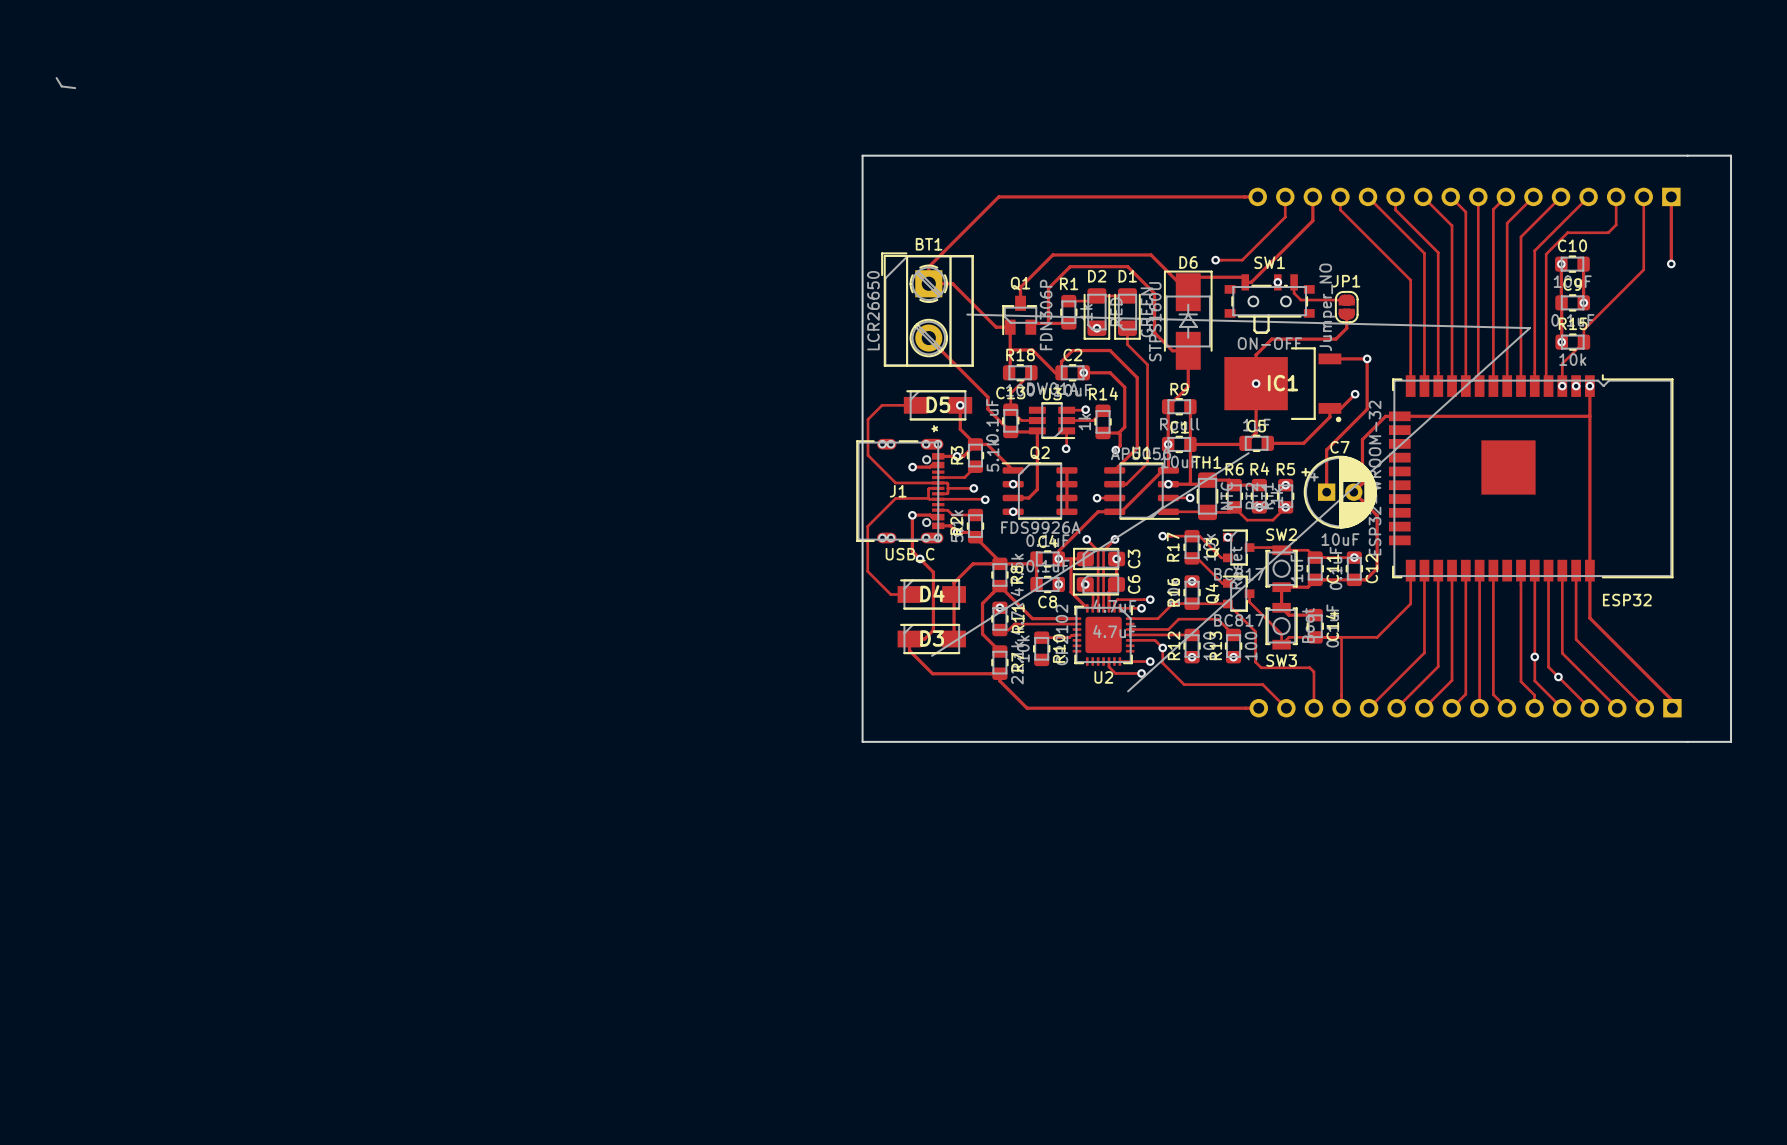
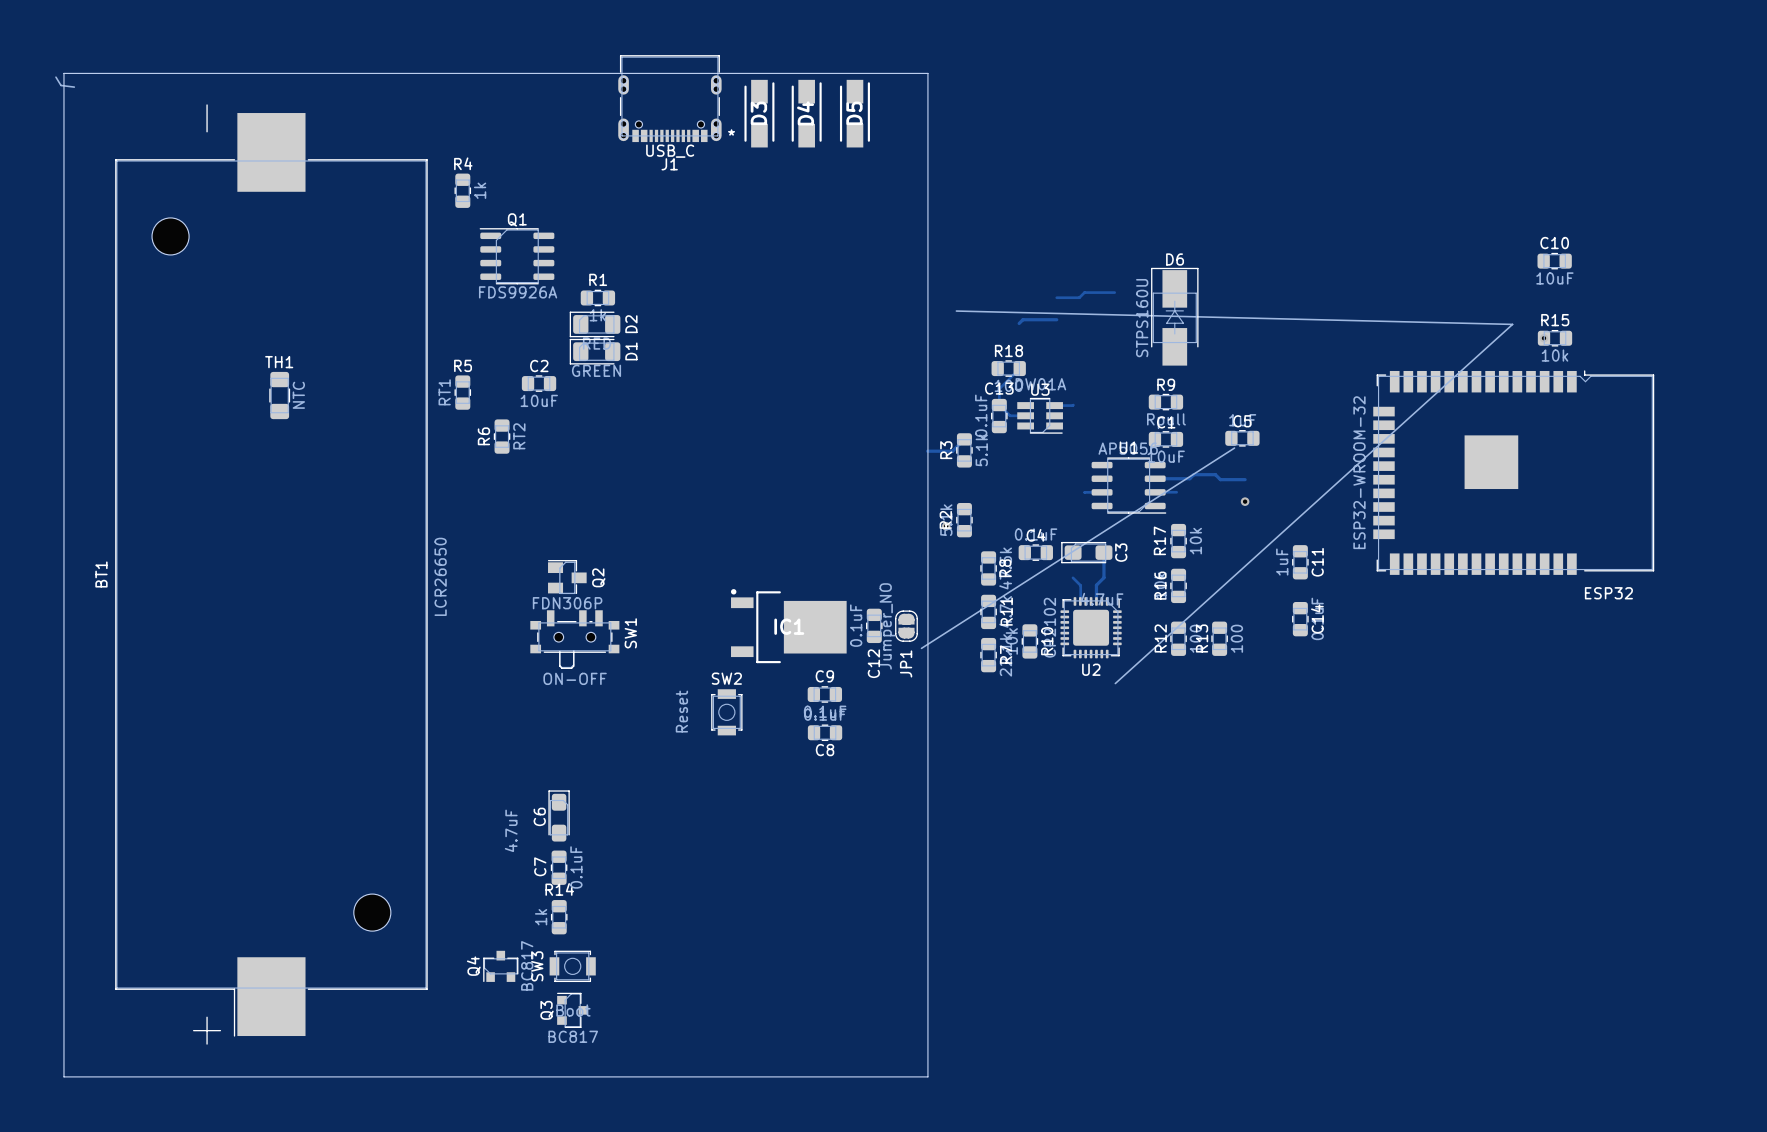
board edge: none -> (63, 73) (927, 73) (927, 1076) (63, 1076) (63, 73)
board edge: (862, 155) (1731, 155) (1731, 741) (862, 741) (862, 155) -> none
track: (1257, 196) (998, 196) (928, 266) (928, 283) (952, 283) (996, 327) (1010, 327) (1009, 372) -> none
track: (1285, 196) (1285, 217) (1242, 260) (1215, 260) -> none
track: (1312, 196) (1312, 220) (1251, 282) (1245, 282) (1244, 277) (1192, 277) (1188, 281) (1188, 292) (1151, 255) (1052, 255) (1020, 287) (1020, 303) -> none
track: (1340, 196) (1340, 209) (1410, 280) (1410, 386) -> none
track: (1368, 196) (1424, 253) (1424, 386) -> none
track: (1395, 196) (1395, 209) (1438, 252) (1438, 386) -> none
track: (1423, 196) (1452, 225) (1452, 386) -> none
track: (1450, 196) (1465, 212) (1465, 386) -> none
part: (1464, 196) -> none
track: (1478, 196) (1479, 386) -> none
track: (1505, 196) (1493, 209) (1493, 386) -> none
track: (1533, 196) (1507, 223) (1507, 386) -> none
track: (1561, 196) (1520, 236) (1520, 386) -> none
track: (1588, 196) (1534, 250) (1534, 386) -> none
track: (1616, 196) (1616, 224) (1608, 232) (1567, 232) (1546, 254) (1546, 383) (1548, 386) -> none
track: (1643, 196) (1643, 269) (1583, 329) (1583, 342) (1562, 363) (1562, 386) -> none
track: (1671, 196) (1671, 263) -> none
BT1 name position: BT1 (929, 244) -> BT1 (101, 574)
BT1 footprint: [881, 252, 974, 367] -> [115, 104, 428, 1045]
via: (1215, 260) -> none
SW1 name rotation: 0° (1269, 262) -> 90° counterclockwise (630, 633)
SW1 name position: SW1 (1269, 262) -> SW1 (630, 633)
via: (1671, 263) -> none
track: (1561, 264) (1561, 342) -> none
via: (1561, 264) -> none
track: (1583, 264) (1583, 302) -> none
JP1 name rotation: 0° (1346, 281) -> 90° counterclockwise (906, 663)
JP1 name position: JP1 (1346, 281) -> JP1 (906, 663)
via: (1277, 282) -> none
track: (1294, 282) (1294, 293) (1300, 300) (1346, 300) -> none
Q1 footprint: [1002, 295, 1037, 335] -> [479, 228, 555, 285]
C9 position: (1572, 302) -> (824, 694)
via: (1583, 302) -> none
SW1 position: (1269, 303) -> (574, 639)
JP1 position: (1346, 307) -> (906, 626)
BT1 value position: LCR26650 (873, 310) -> LCR26650 (440, 576)
R1 rotation: 0° (1068, 312) -> 90° clockwise (597, 297)
R1 position: (1068, 312) -> (597, 297)
D2 rotation: 0° (1096, 313) -> 90° clockwise (595, 324)
D2 position: (1096, 313) -> (595, 324)
D1 rotation: 0° (1127, 313) -> 90° clockwise (595, 351)
D1 position: (1127, 313) -> (595, 351)
Q1 value: FDN306P (1046, 314) -> FDS9926A (518, 292)
track: (1346, 314) (1346, 328) (1335, 339) (1271, 339) (1256, 354) (1256, 432) (1244, 444) (1190, 444) -> none
track: (1048, 323) (1048, 288) (1070, 266) (1127, 266) (1154, 293) (1154, 332) (1172, 350) (1188, 350) (1188, 386) (1168, 406) (1168, 470) (1162, 470) (1121, 511) (1098, 511) (1059, 550) (1058, 558) (1085, 558) -> none
via: (1096, 328) -> none
track: (1127, 328) (1127, 344) (1147, 364) (1147, 463) (1126, 484) (1114, 484) -> none
track: (928, 338) (987, 397) (987, 409) (1010, 431) (1037, 430) (1037, 489) (1028, 498) (1013, 498) -> none
track: (1010, 349) (1032, 349) (1055, 372) (1061, 372) (1061, 361) (1072, 350) (1110, 350) (1137, 377) (1137, 447) (1114, 470) -> none
track: (1329, 358) (1367, 358) (1367, 409) (1326, 449) (1326, 492) -> none
via: (1367, 358) -> none
C2 position: (1072, 372) -> (539, 383)
track: (1083, 372) (1110, 372) (1124, 387) (1124, 427) (1118, 433) -> none
via: (1083, 372) -> none
via: (1256, 383) -> none
IC1 rotation: 0° (1282, 384) -> 180° (788, 626)
IC1 position: (1282, 384) -> (788, 626)
via: (1562, 386) -> none
via: (1576, 386) -> none
track: (1589, 386) (1589, 618) (1672, 700) (1672, 708) -> none
via: (1589, 386) -> none
D5 footprint: [903, 390, 973, 421] -> [839, 79, 870, 148]
track: (1355, 394) (1340, 408) (1329, 408) (1329, 417) (1303, 443) (1267, 443) -> none
via: (1355, 394) -> none
track: (915, 405) (882, 405) (868, 419) (868, 455) (895, 482) (947, 482) (947, 493) (938, 493) -> none
track: (960, 405) (960, 429) (975, 444) (987, 444) (1013, 470) -> none
via: (960, 405) -> none
track: (1190, 406) (1190, 484) -> none
via: (1085, 409) -> none
track: (1103, 410) (1093, 420) (1066, 420) -> none
track: (1589, 416) (1385, 416) (1362, 439) (1362, 483) (1353, 492) (1377, 515) (1377, 568) (1365, 579) (1315, 579) (1307, 587) (1281, 587) (1281, 607) (1288, 615) (1315, 615) -> none
R14 position: (1103, 421) -> (559, 917)
track: (1066, 430) (1066, 448) -> none
track: (1103, 433) (1118, 433) -> none
track: (1118, 433) (1120, 445) (1115, 450) -> none
via: (1168, 444) -> none
C7 name position: C7 (1339, 447) -> C7 (540, 866)
via: (1066, 448) -> none
via: (1115, 450) -> none
Q2 name position: Q2 (1040, 453) -> Q2 (598, 577)
via: (957, 456) -> none
C7 footprint: [1301, 456, 1377, 529] -> [550, 850, 568, 885]
Q2 footprint: [1001, 462, 1078, 520] -> [547, 560, 587, 595]
track: (938, 465) (912, 467) -> none
track: (975, 466) (964, 477) (938, 477) -> none
via: (912, 467) -> none
R6 name rotation: 0° (1234, 469) -> 90° counterclockwise (483, 436)
R6 name position: R6 (1234, 469) -> R6 (483, 436)
track: (1066, 470) (1066, 511) -> none
via: (1013, 484) -> none
via: (1168, 484) -> none
via: (1285, 485) -> none
track: (938, 488) (928, 489) (928, 498) -> none
track: (947, 488) (973, 488) -> none
via: (973, 488) -> none
J1 name position: J1 (898, 491) -> J1 (669, 164)
J1 rotation: 0° (900, 491) -> 90° clockwise (669, 98)
J1 position: (900, 491) -> (669, 98)
TH1 position: (1207, 496) -> (279, 395)
R6 position: (1234, 496) -> (502, 436)
R4 position: (1259, 496) -> (462, 190)
R5 position: (1285, 496) -> (462, 392)
via: (1190, 497) -> none
track: (928, 498) (985, 499) -> none
track: (928, 498) (895, 498) (867, 526) (867, 571) (890, 594) (909, 594) -> none
via: (1097, 498) -> none
via: (985, 499) -> none
track: (1285, 507) (1272, 520) (1247, 520) (1234, 507) (1229, 512) (1168, 511) -> none
via: (1285, 507) -> none
track: (938, 510) (947, 510) (952, 514) (975, 514) -> none
via: (1013, 511) -> none
via: (912, 515) -> none
track: (938, 517) (912, 515) (912, 551) (933, 572) (933, 630) (924, 639) (909, 639) (909, 650) (932, 673) (999, 673) (999, 681) (1027, 708) (1258, 708) -> none
track: (938, 525) (950, 525) (957, 532) (970, 532) (999, 563) -> none
Q2 value: FDS9926A (1040, 527) -> FDN306P (567, 603)
track: (1162, 536) (1199, 536) (1221, 557) (1227, 557) -> none
via: (1162, 536) -> none
via: (1227, 537) -> none
track: (1086, 539) (1098, 550) (1098, 608) -> none
via: (1086, 539) -> none
track: (1114, 539) (1103, 550) (1103, 608) -> none
via: (1114, 539) -> none
C7 value: 10uF (1340, 539) -> 0.1uF (576, 867)
Q3 position: (1238, 547) -> (572, 1010)
track: (1249, 547) (1307, 550) (1315, 557) (1354, 557) -> none
via: (1354, 557) -> none
via: (920, 558) -> none
via: (1058, 558) -> none
track: (1071, 558) (1071, 592) (1087, 608) -> none
via: (1116, 558) -> none
track: (1192, 558) (1197, 558) (1222, 583) (1227, 583) -> none
SW2 position: (1281, 568) -> (726, 712)
C12 position: (1354, 568) -> (874, 625)
C12 name position: C12 (1371, 568) -> C12 (873, 663)
track: (1410, 570) (1410, 603) (1377, 637) (1288, 637) (1281, 644) (1281, 634) (1249, 602) (1249, 593) -> none
track: (1424, 570) (1424, 652) (1369, 708) -> none
track: (1438, 570) (1438, 666) (1396, 708) -> none
track: (1452, 570) (1452, 680) (1424, 708) -> none
track: (1465, 570) (1465, 694) (1451, 708) -> none
track: (1479, 570) (1479, 708) -> none
track: (1493, 570) (1493, 694) (1506, 708) -> none
track: (1520, 570) (1520, 681) (1534, 695) (1534, 708) -> none
track: (1534, 570) (1534, 680) (1562, 708) -> none
track: (1548, 570) (1548, 667) (1589, 708) -> none
track: (1562, 570) (1562, 653) (1617, 708) -> none
track: (1576, 570) (1576, 639) (1644, 708) -> none
D4 footprint: [897, 579, 966, 610] -> [791, 79, 822, 148]
via: (1192, 581) -> none
track: (1036, 584) (1036, 558) (1031, 563) (973, 563) (954, 582) (954, 639) -> none
C8 position: (1047, 584) -> (825, 732)
via: (1058, 584) -> none
via: (1085, 584) -> none
C6 rotation: 0° (1099, 584) -> 90° clockwise (559, 815)
C6 position: (1099, 584) -> (559, 815)
C6 name position: C6 (1134, 584) -> C6 (539, 816)
Q4 rotation: 0° (1238, 593) -> 90° counterclockwise (500, 966)
Q4 position: (1238, 593) -> (500, 966)
track: (1150, 599) (1117, 599) (1114, 602) (1114, 608) -> none
via: (1150, 599) -> none
via: (999, 607) -> none
track: (1119, 608) (1141, 608) -> none
via: (1141, 608) -> none
track: (1076, 618) (1032, 618) (999, 586) (982, 603) (982, 634) (999, 651) -> none
track: (1130, 618) (1157, 618) (1172, 603) (1227, 603) (1255, 631) (1255, 662) (1261, 667) (1309, 667) (1313, 671) (1313, 708) -> none
D3 footprint: [897, 623, 966, 655] -> [744, 79, 775, 148]
track: (1076, 624) (1014, 624) (1008, 630) (999, 630) -> none
SW3 rotation: 0° (1281, 626) -> 90° clockwise (572, 966)
SW3 position: (1281, 626) -> (572, 966)
track: (1130, 629) (1168, 629) (1178, 619) (1217, 619) (1233, 634) -> none
track: (1076, 634) (1069, 637) (1041, 637) -> none
track: (1130, 634) (1192, 634) -> none
track: (1341, 637) (1341, 708) -> none
track: (1130, 640) (1155, 640) (1162, 647) (1162, 663) (1184, 684) (1262, 684) (1286, 708) -> none
via: (1162, 647) -> none
via: (1534, 656) -> none
via: (1192, 657) -> none
via: (1233, 657) -> none
track: (1109, 661) (1109, 666) (1115, 673) (1141, 673) -> none
track: (1119, 661) (1150, 661) -> none
via: (1150, 661) -> none
via: (1141, 673) -> none
via: (1558, 676) -> none
part: (1465, 708) -> none

